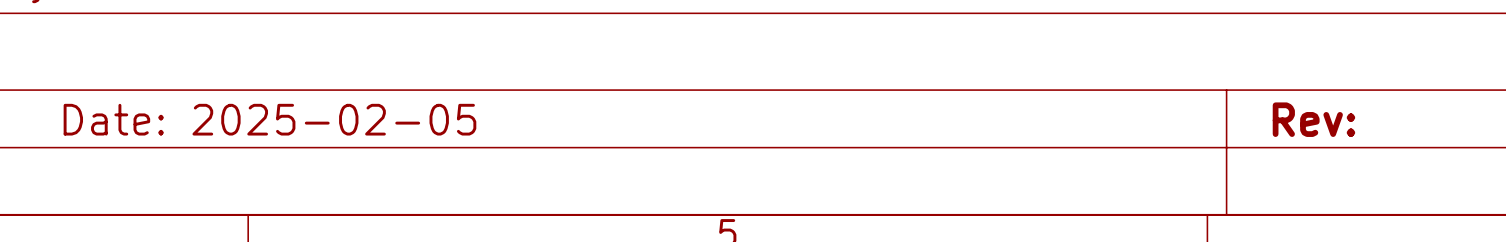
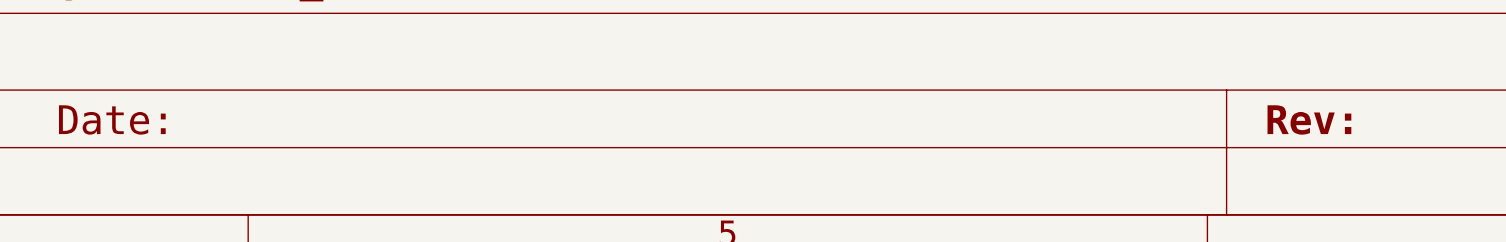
title block: Date: 2025-02-05 (269, 119) -> Date: (112, 119)

